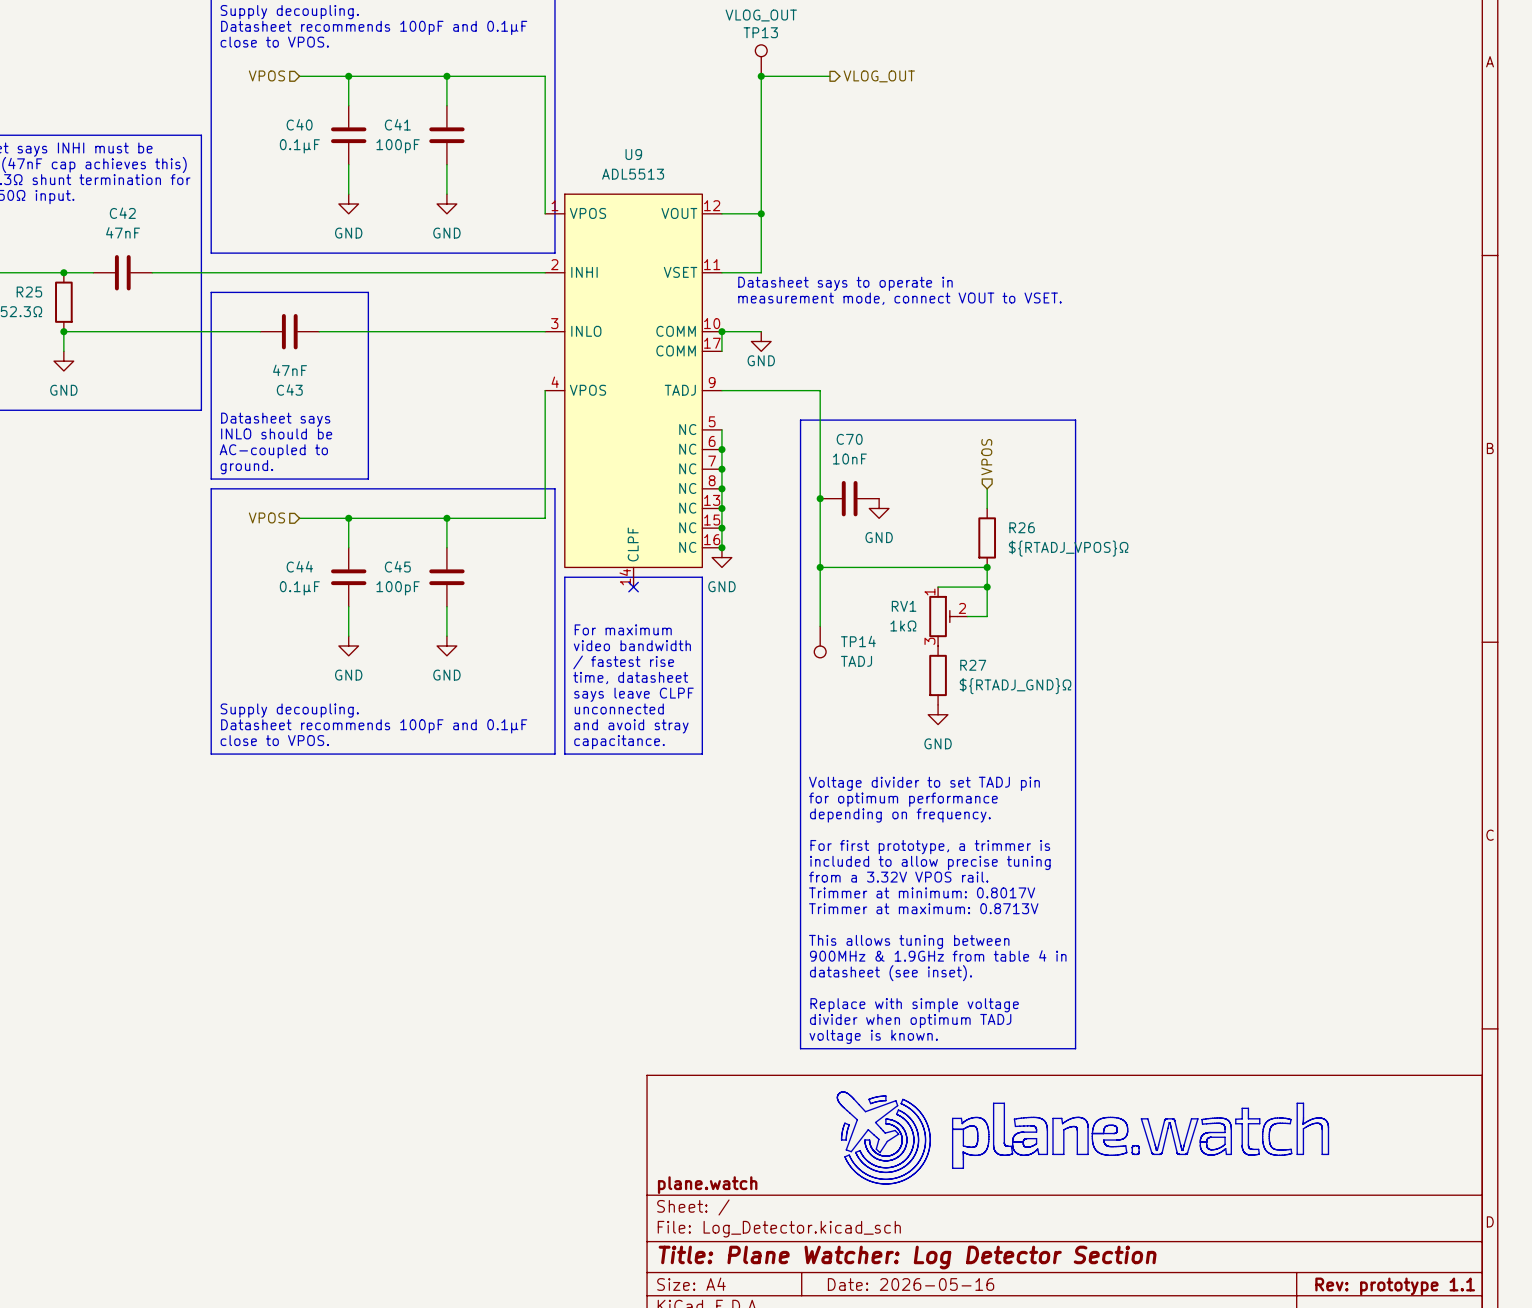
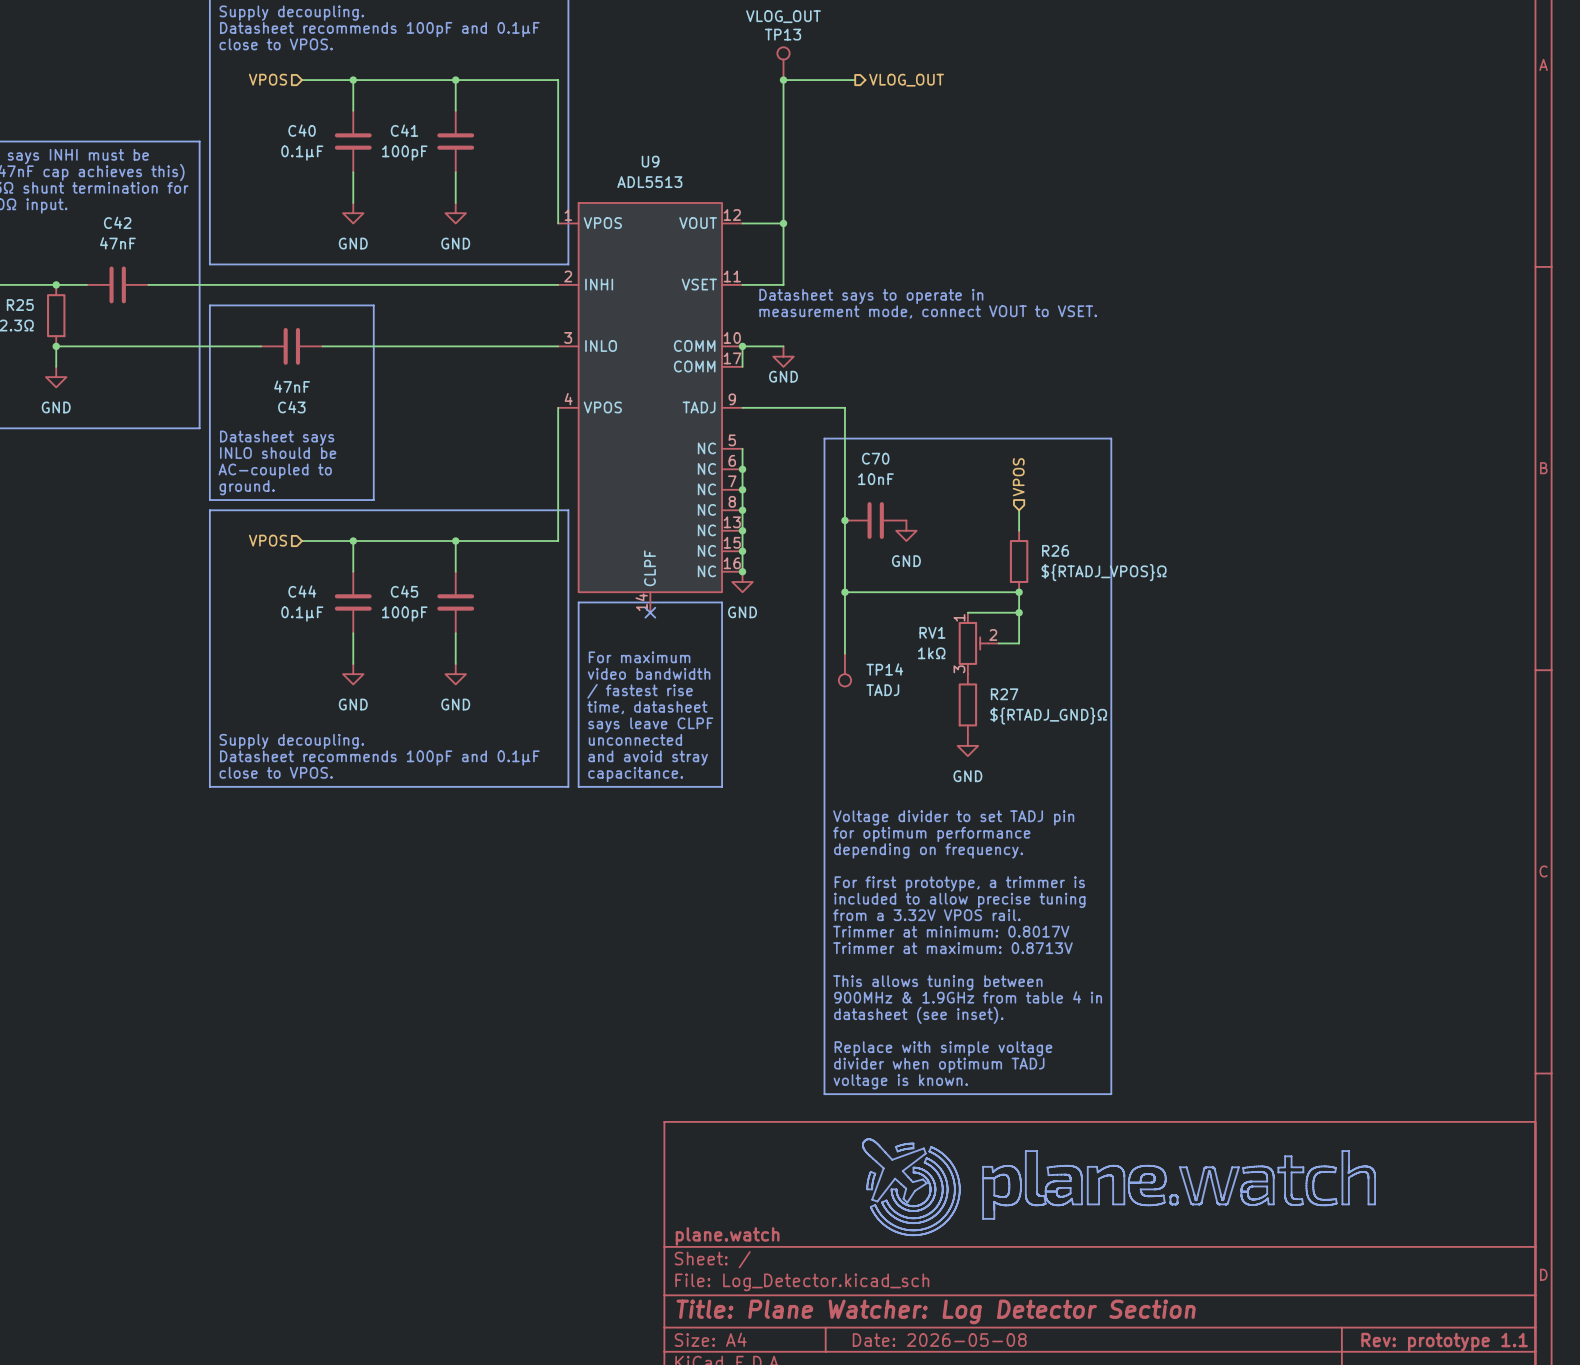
title block: Date: 2026-05-16 (911, 1284) -> Date: 2026-05-08 (939, 1340)

